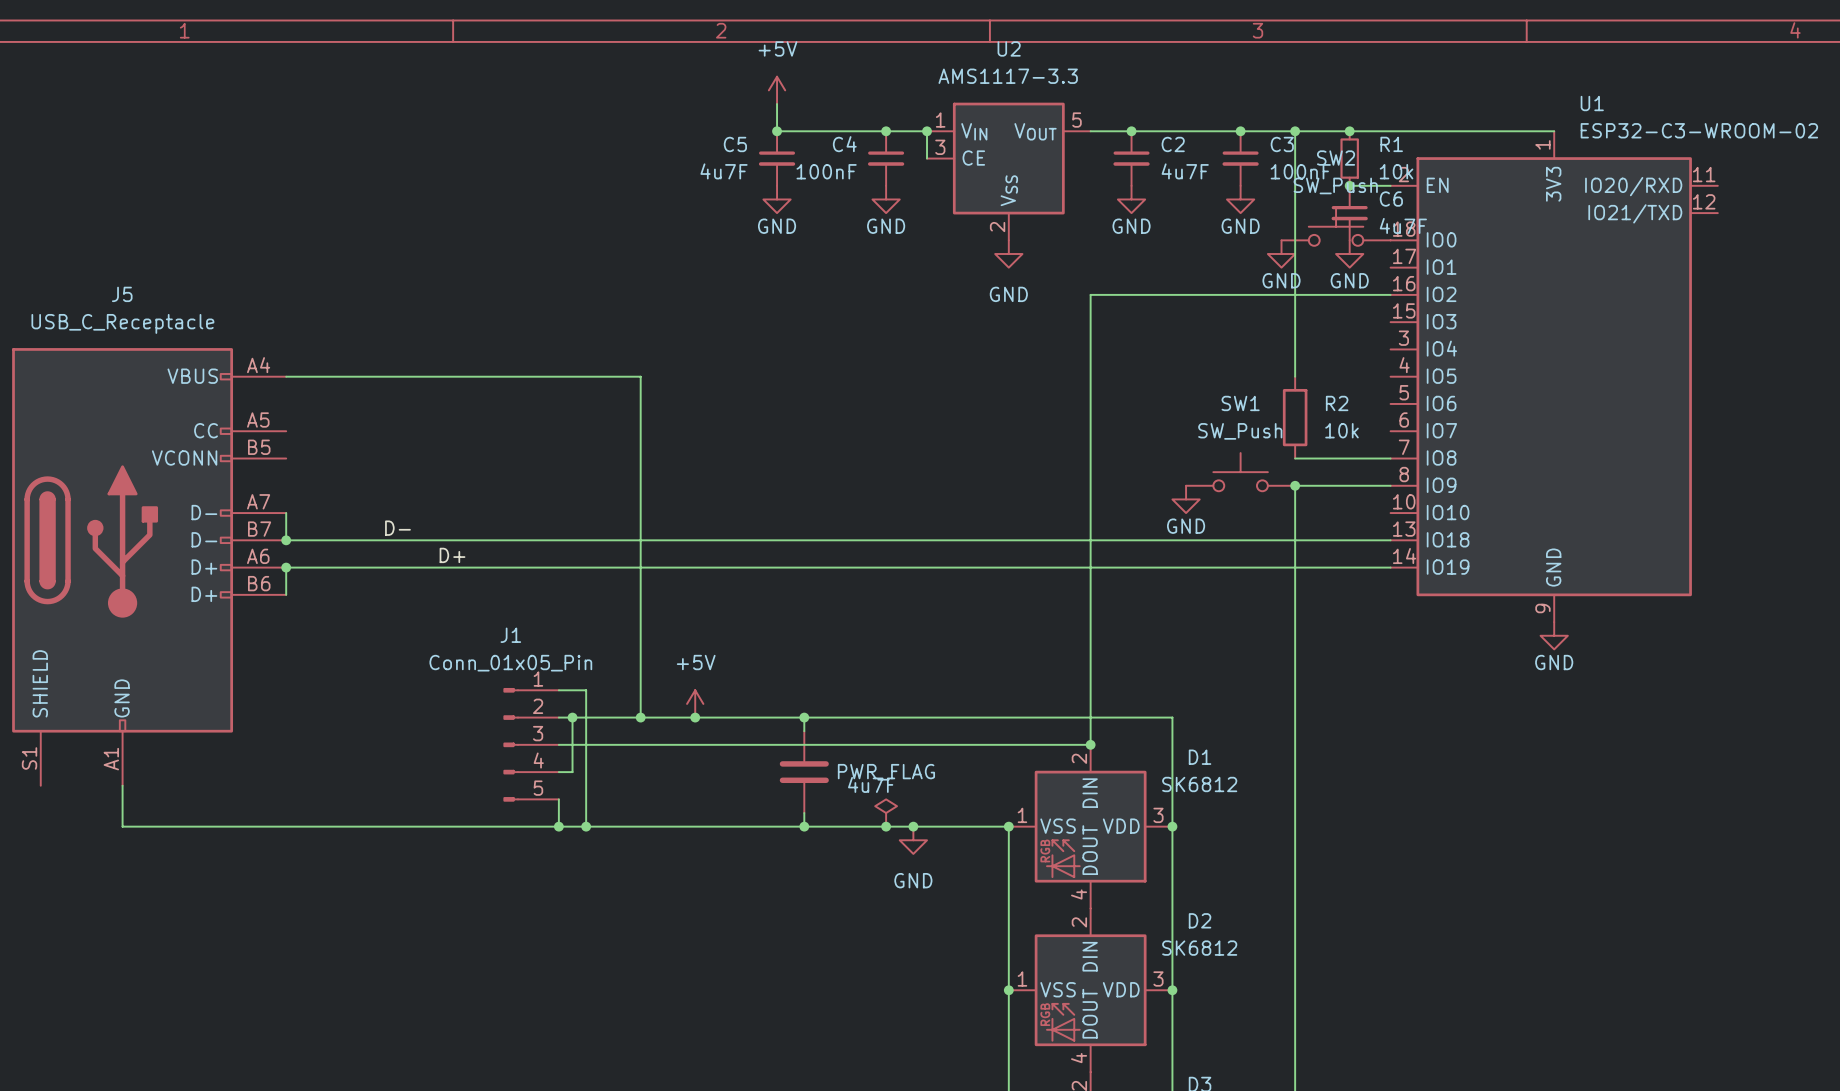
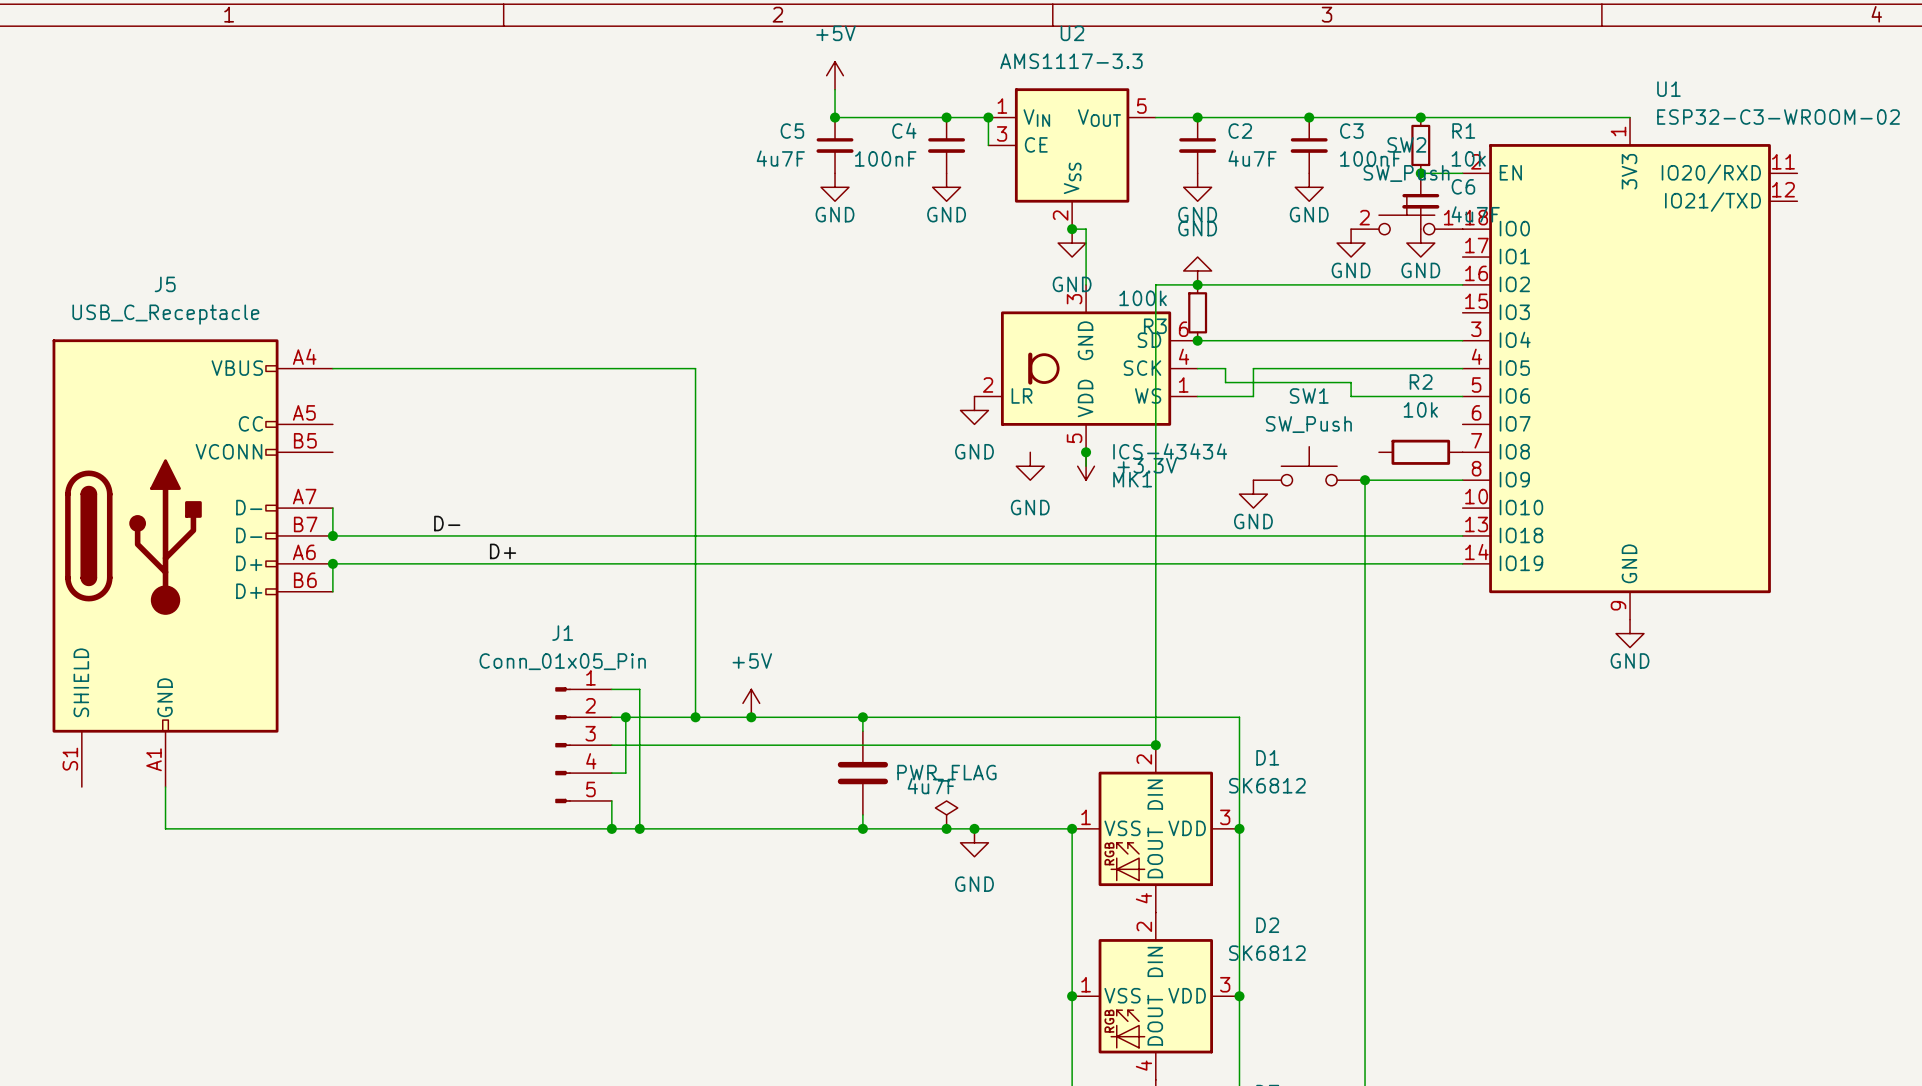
wire: (1295, 131) (1295, 376) -> none
junction: (1295, 131) -> none
SW2 pin number: none -> 2 (1364, 217)
SW2 pin number: none -> 1 (1448, 217)
wire: none -> (1072, 229) (1086, 229) (1086, 284)
junction: none -> (1072, 229)
power symbol: none -> GND (1197, 270)
junction: none -> (1197, 284)
R3: none -> 100k (1197, 312)
wire: none -> (1197, 340) (1462, 340)
junction: none -> (1197, 340)
MK1: none -> ICS-43434 (1086, 368)
wire: none -> (1197, 368) (1225, 368) (1225, 382) (1351, 382) (1351, 396) (1462, 396)
wire: none -> (1462, 368) (1253, 368) (1253, 396) (1197, 396)
R2 name position: R2 (1337, 403) -> R2 (1421, 382)
power symbol: none -> GND (974, 410)
R2 rotation: 0° (1295, 417) -> 90° clockwise (1420, 452)
R2 position: (1295, 417) -> (1420, 452)
R2 value position: 10k (1341, 430) -> 10k (1420, 409)
wire: none -> (1086, 452) (1086, 466)
junction: none -> (1086, 452)
wire: (1295, 458) (1390, 458) -> none
power symbol: none -> GND (1030, 466)
power symbol: none -> +3.3V (1086, 466)

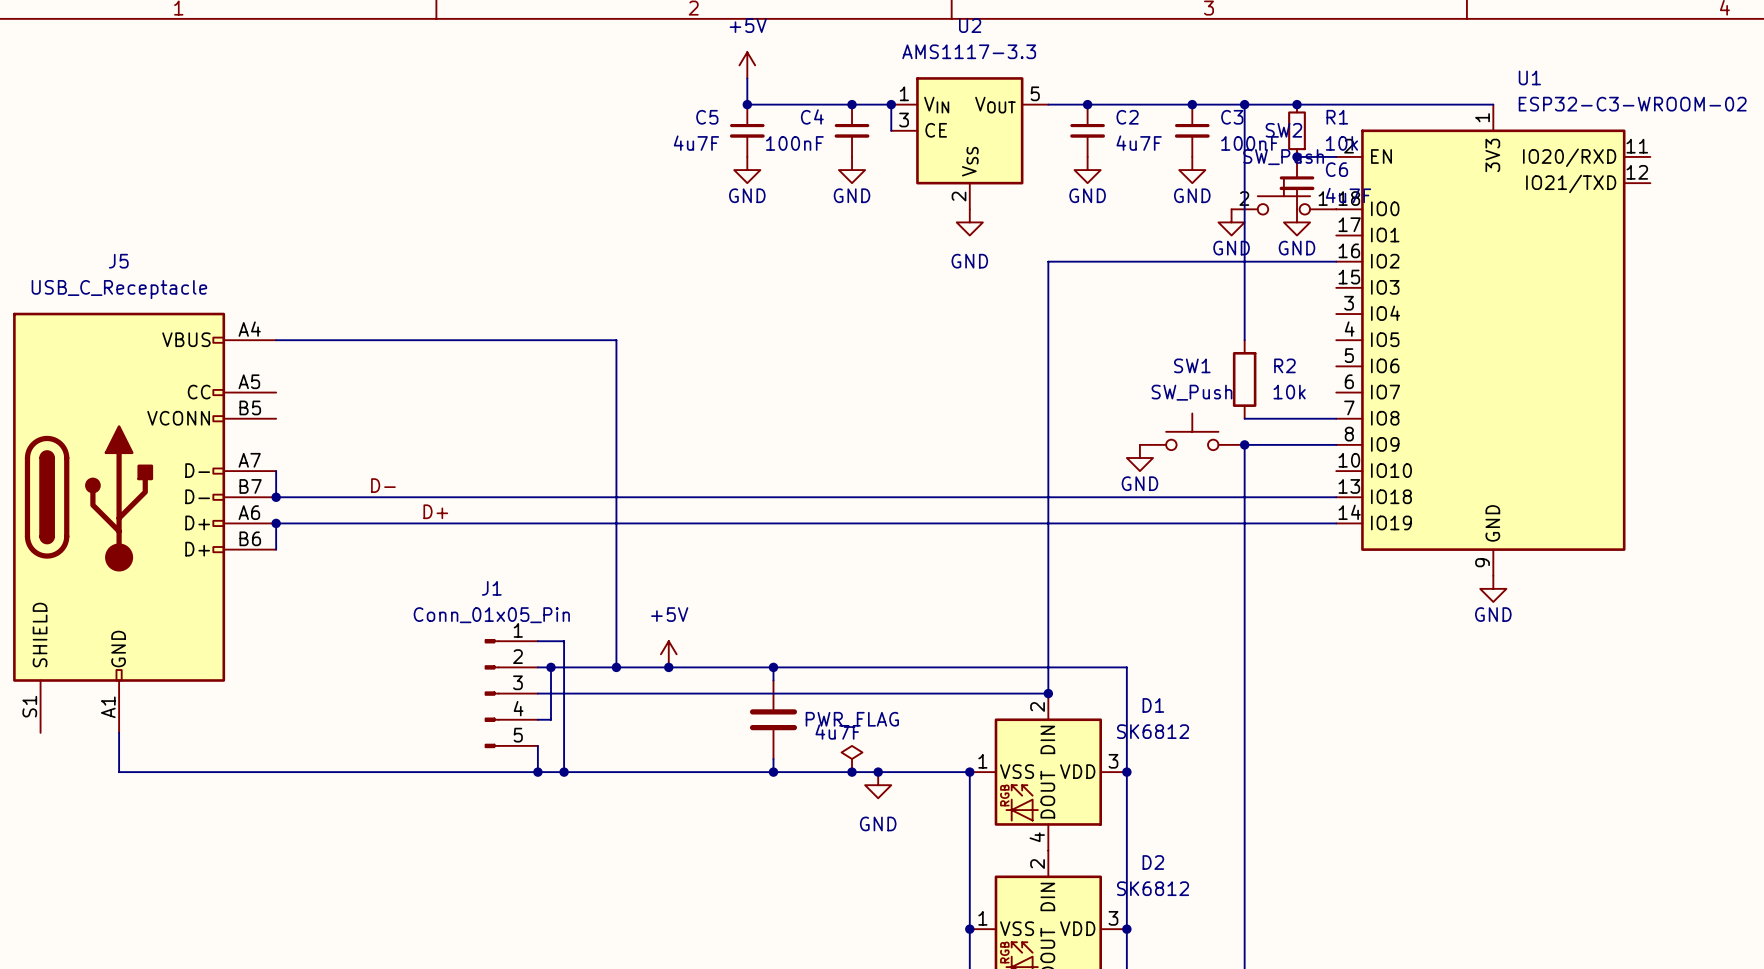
wire: none -> (1244, 104) (1244, 340)
junction: none -> (1244, 104)
wire: (1072, 229) (1086, 229) (1086, 284) -> none
junction: (1072, 229) -> none
power symbol: GND (1197, 270) -> none
junction: (1197, 284) -> none
R3: 100k (1197, 312) -> none
wire: (1197, 340) (1462, 340) -> none
junction: (1197, 340) -> none
MK1: ICS-43434 (1086, 368) -> none
wire: (1197, 368) (1225, 368) (1225, 382) (1351, 382) (1351, 396) (1462, 396) -> none
wire: (1462, 368) (1253, 368) (1253, 396) (1197, 396) -> none
R2 name position: R2 (1421, 382) -> R2 (1284, 365)
power symbol: GND (974, 410) -> none
wire: (1086, 452) (1086, 466) -> none
junction: (1086, 452) -> none
wire: none -> (1244, 418) (1336, 418)
R2 rotation: 0° (1420, 452) -> 90° clockwise (1244, 379)
R2 position: (1420, 452) -> (1244, 379)
power symbol: GND (1030, 466) -> none
power symbol: +3.3V (1086, 466) -> none

